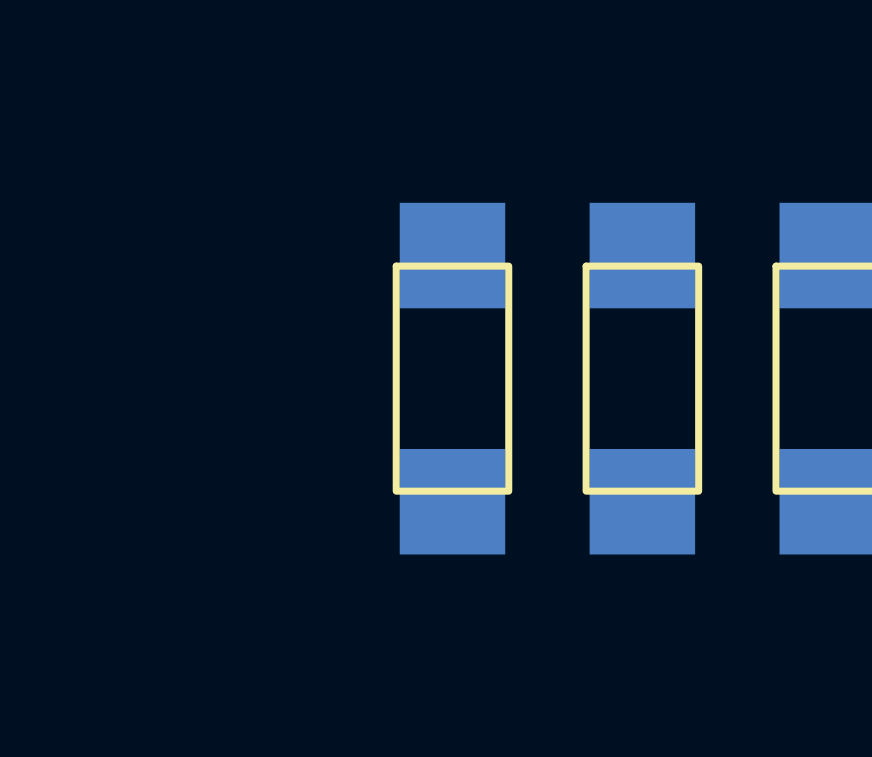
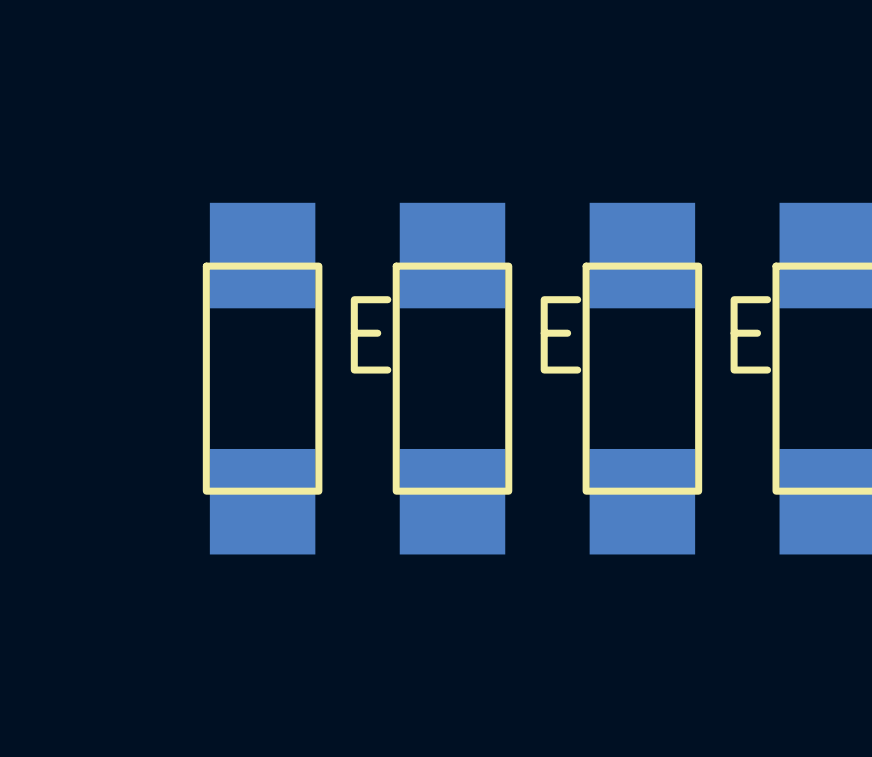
part text: none -> E (560, 334)
part text: none -> E (750, 334)
part: none -> (262, 378)

